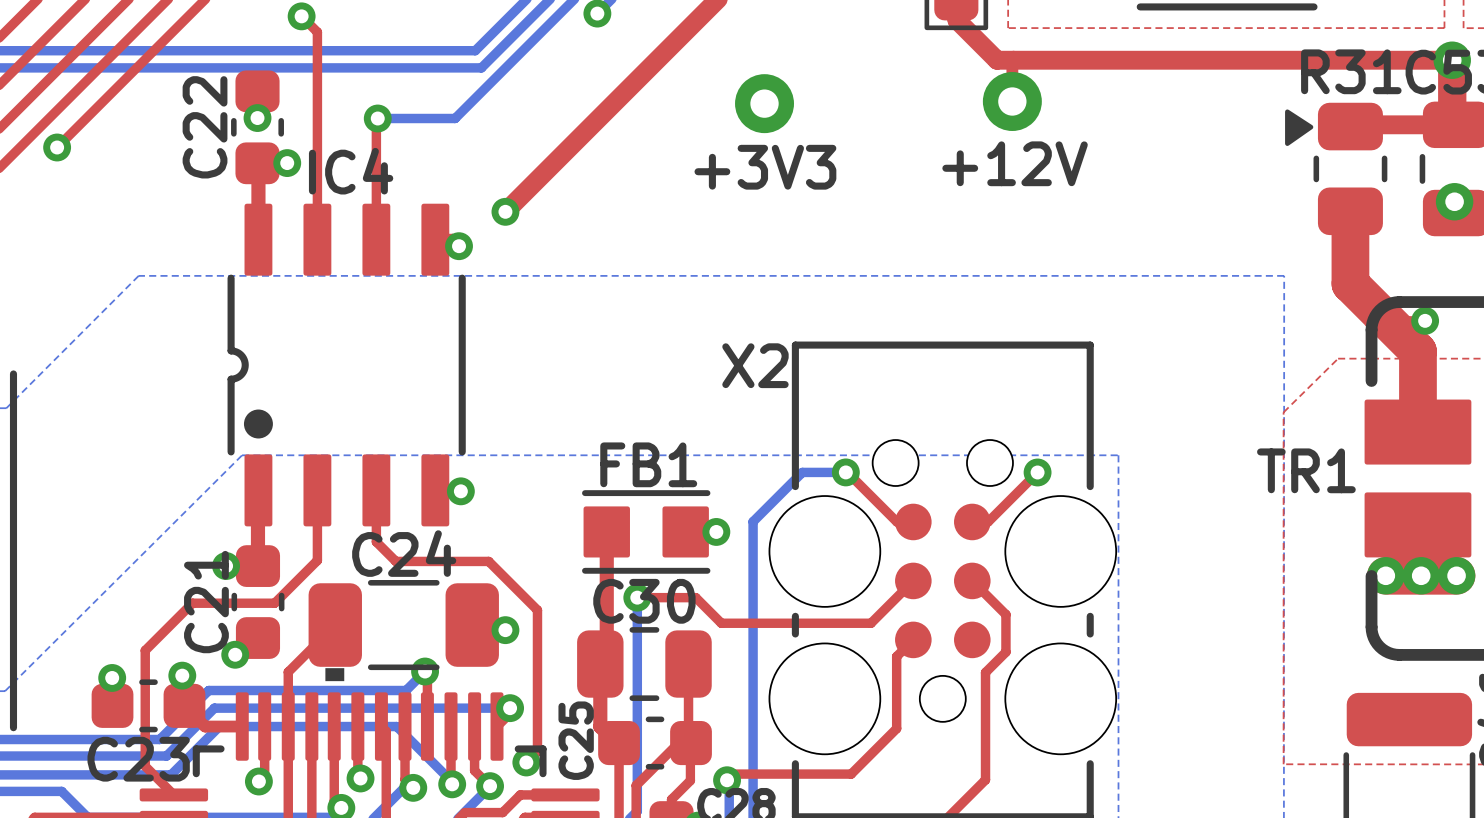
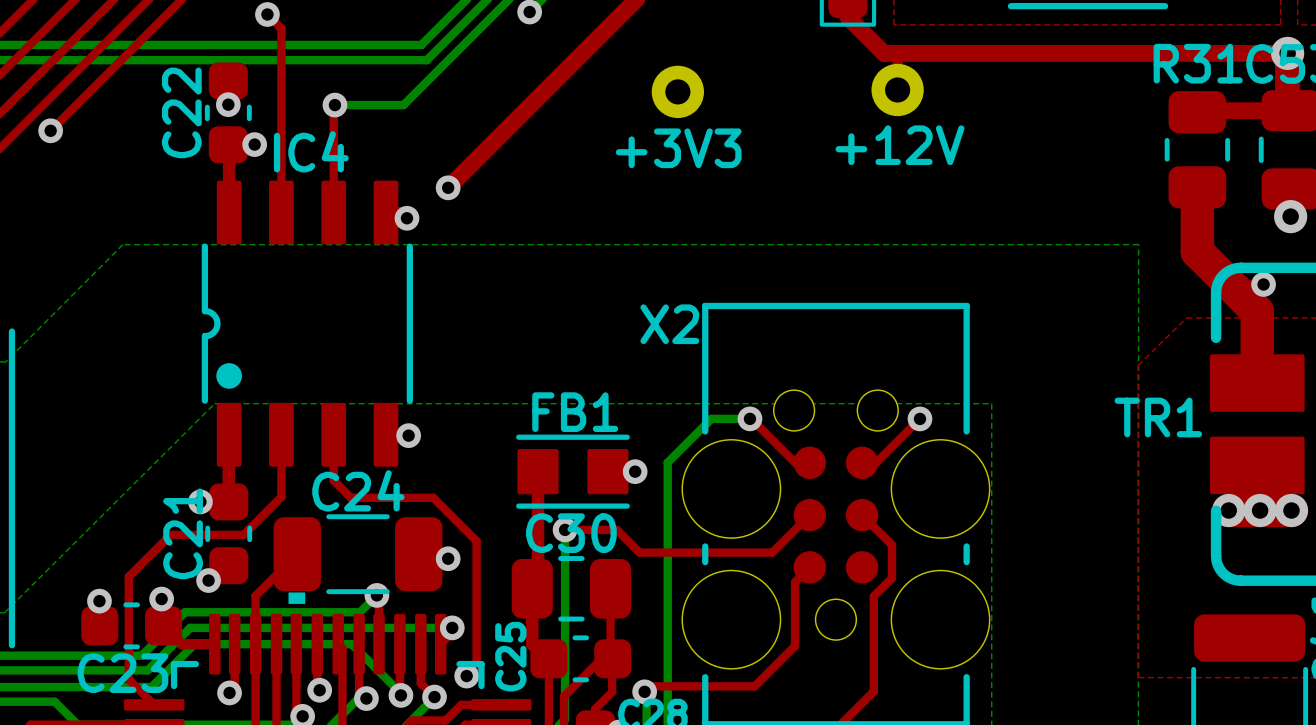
drawing: [1285, 109, 1314, 146] -> none
via position: (1454, 201) -> (1290, 216)

